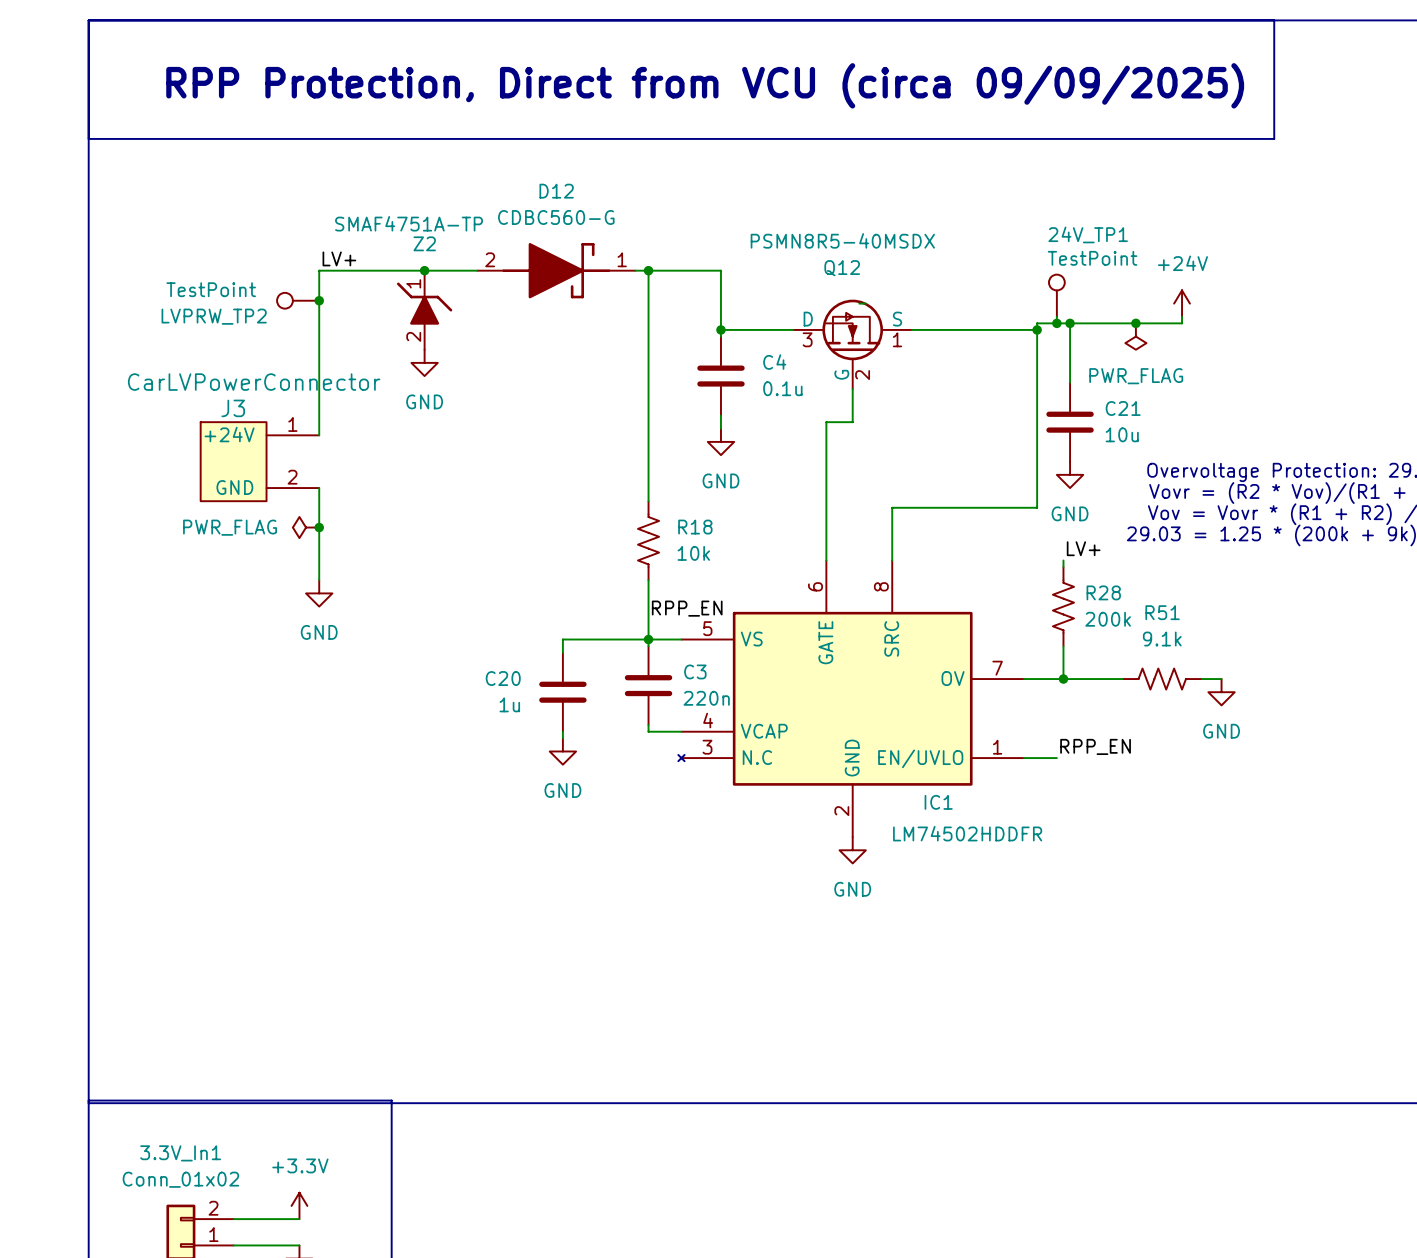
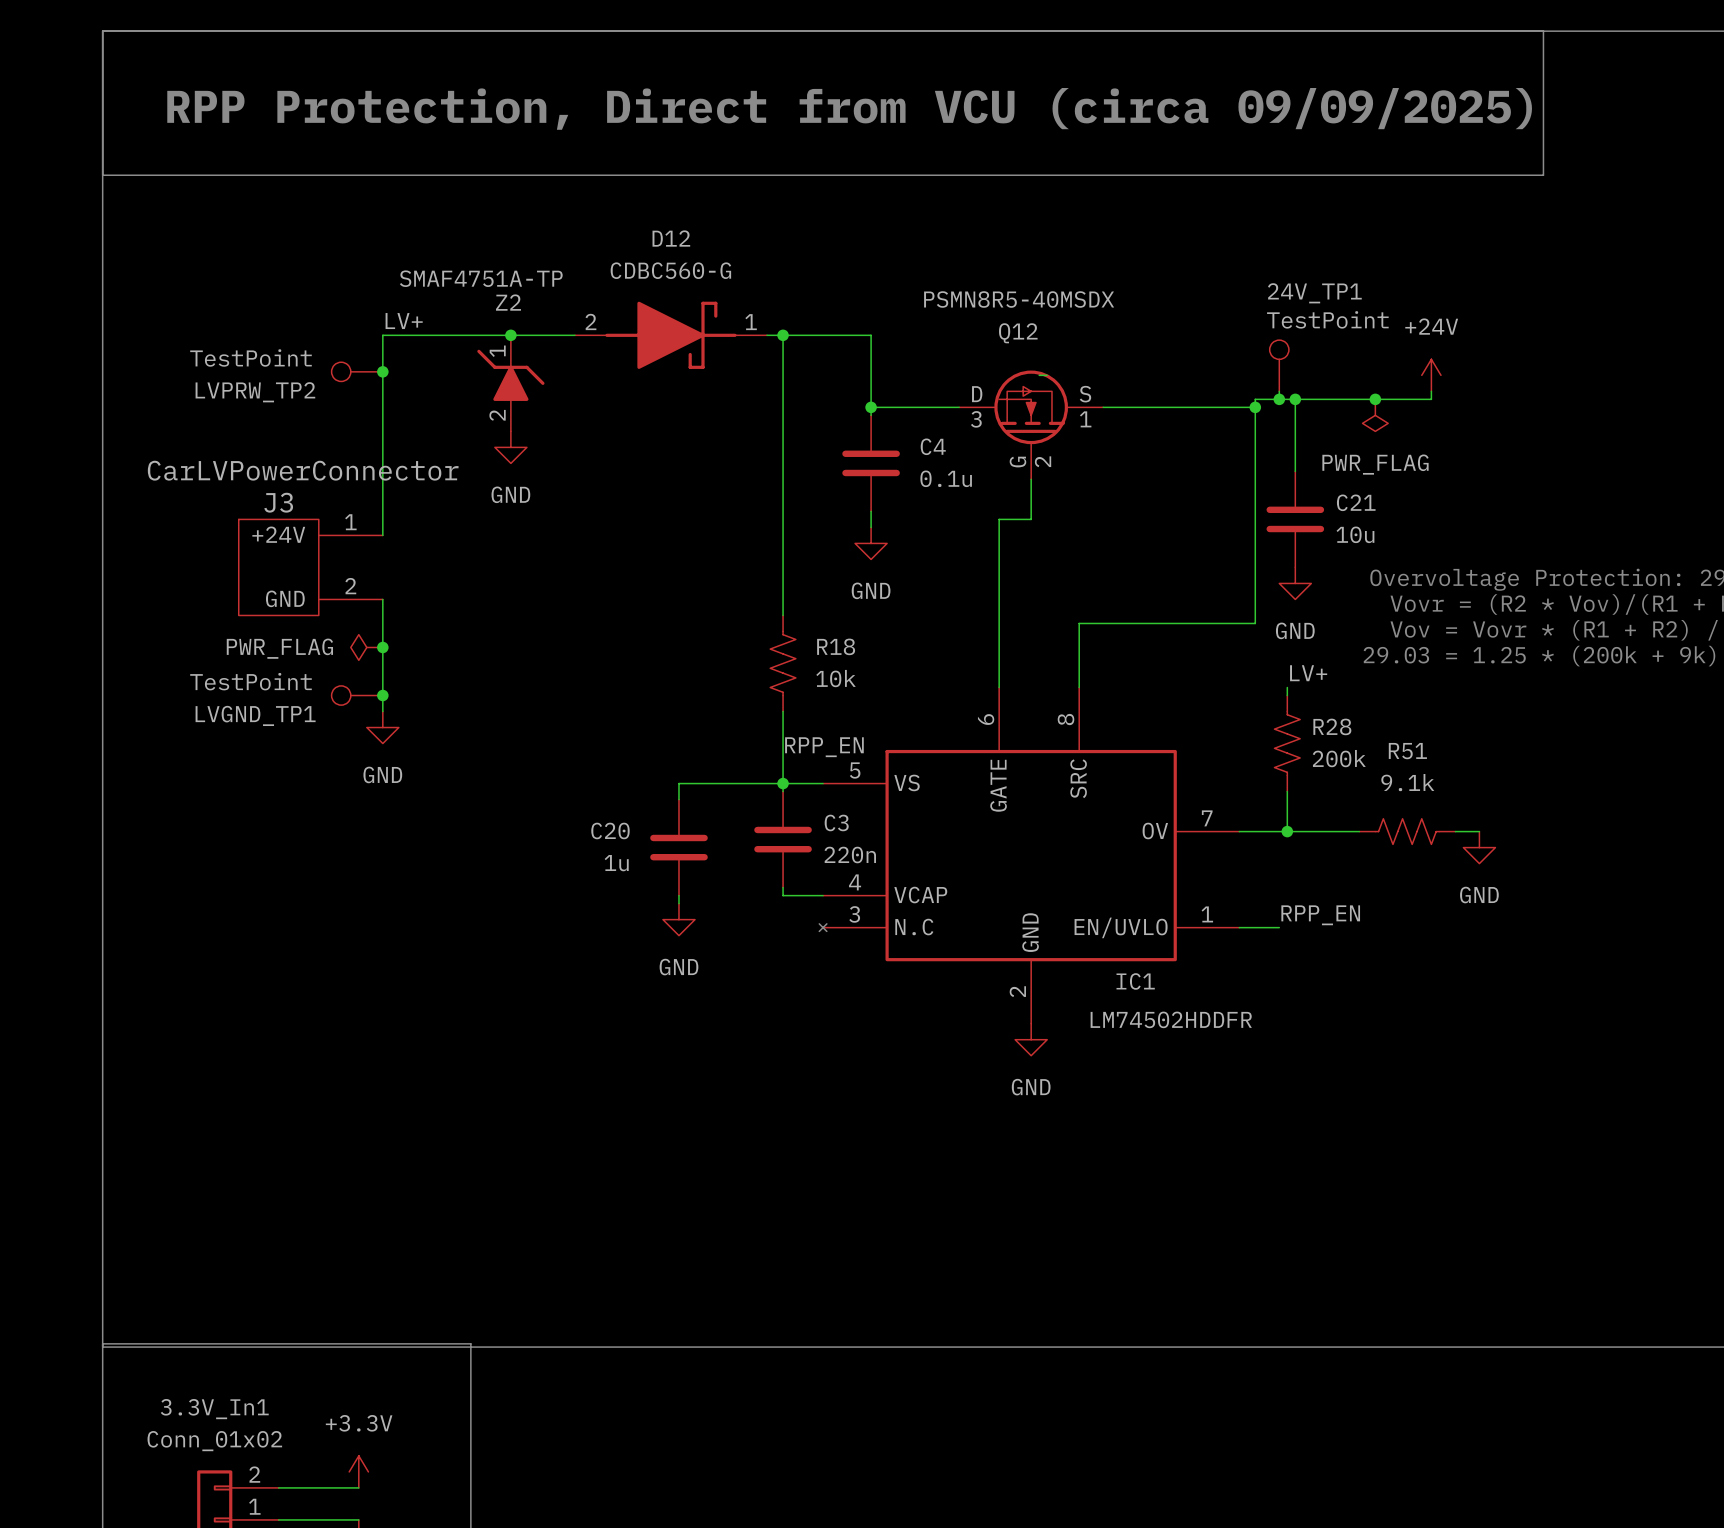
LVGND_TP1: none -> TestPoint (357, 695)
junction: none -> (382, 695)

